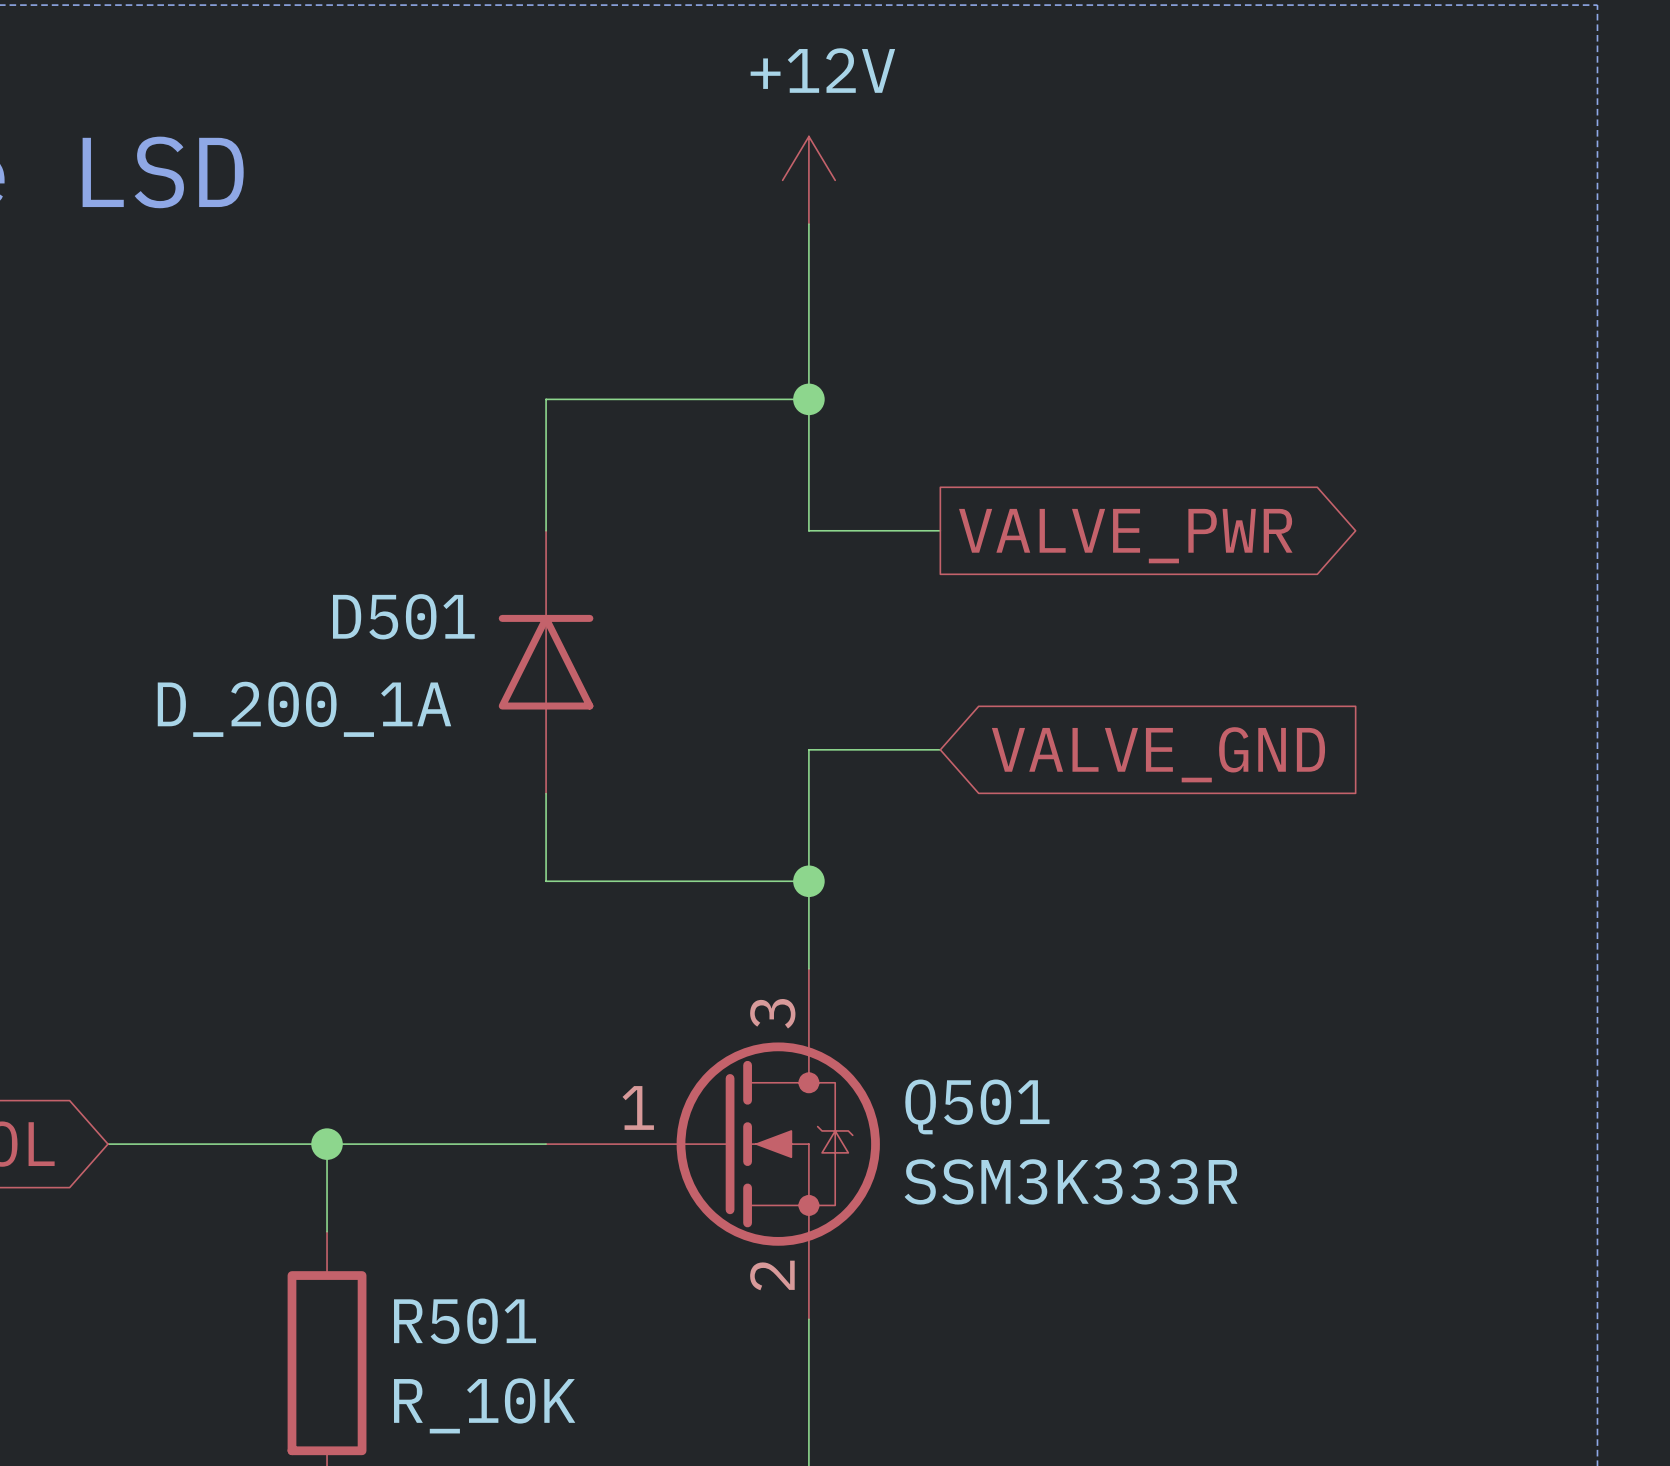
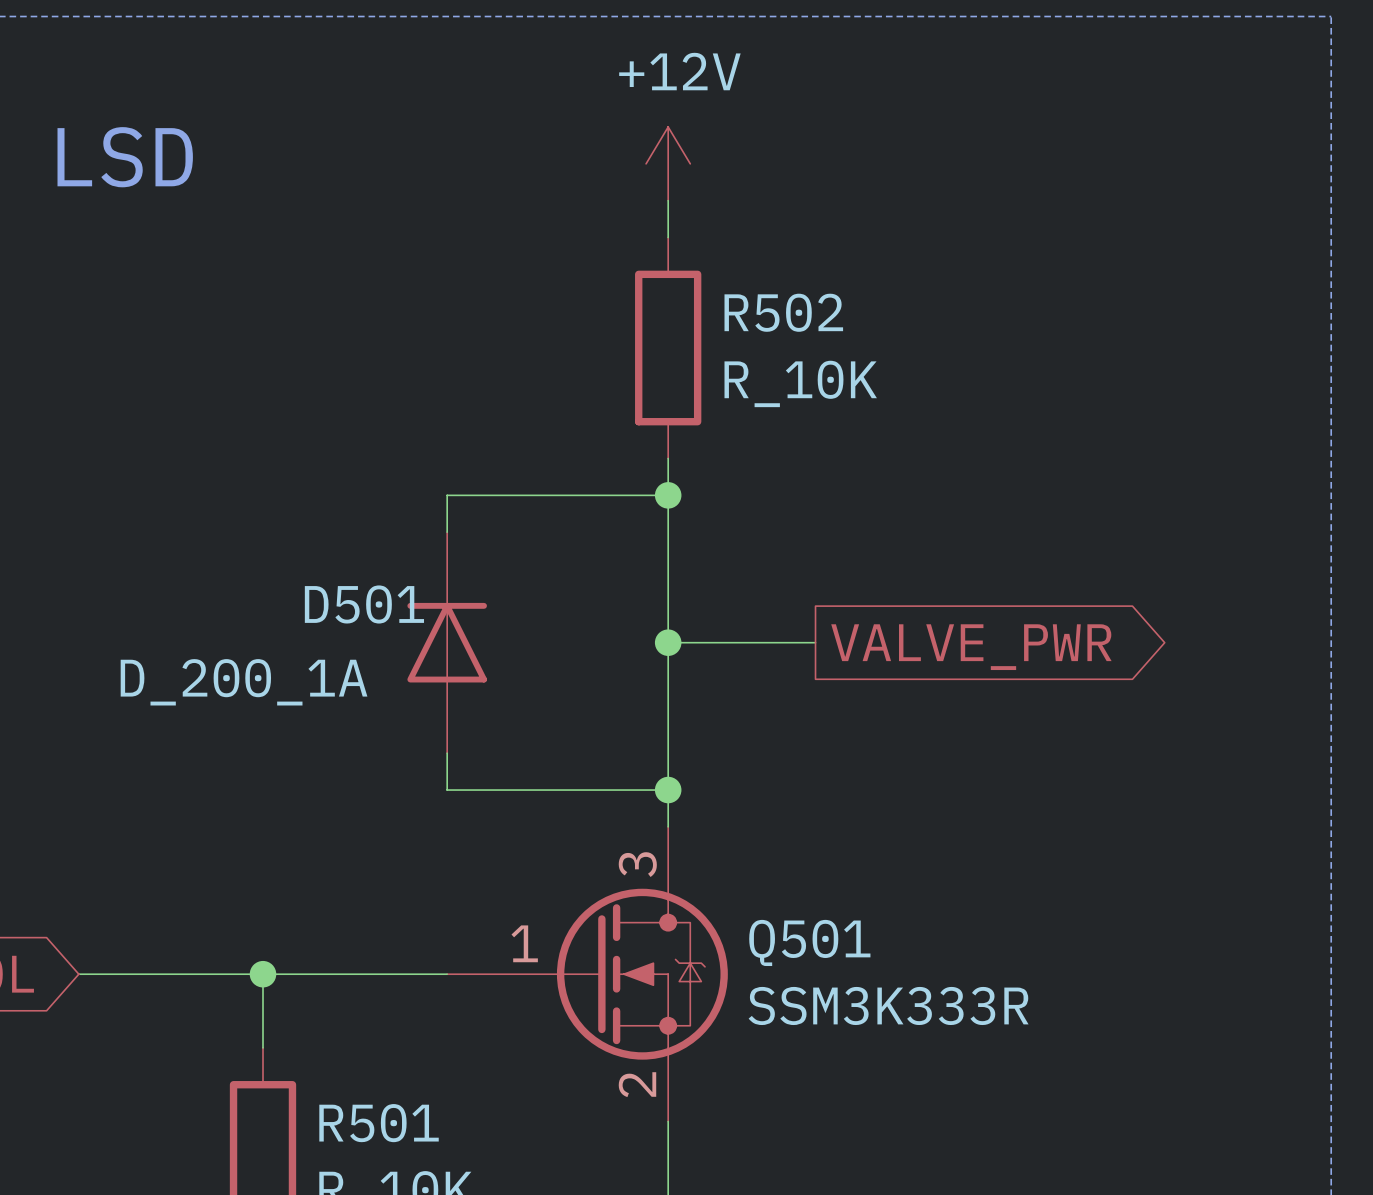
wire: (808, 267) (808, 530) (940, 530) -> none
wire: (808, 399) (546, 399) (546, 530) -> none
R502: none -> R_10K (668, 348)
junction: (808, 399) -> none
wire: none -> (668, 458) (668, 642)
global label position: VALVE_PWR (1125, 536) -> VALVE_PWR (971, 647)
wire: none -> (668, 495) (447, 495) (447, 532)
junction: none -> (668, 495)
D501 name position: D501 (403, 616) -> D501 (364, 604)
D501 position: (546, 662) -> (447, 642)
junction: none -> (668, 642)
wire: none -> (778, 642) (815, 642)
global label: VALVE_GND (1158, 754) -> none
wire: (546, 793) (546, 881) (808, 881) -> none
wire: none -> (447, 753) (447, 790) (668, 790)
junction position: (808, 881) -> (668, 790)

